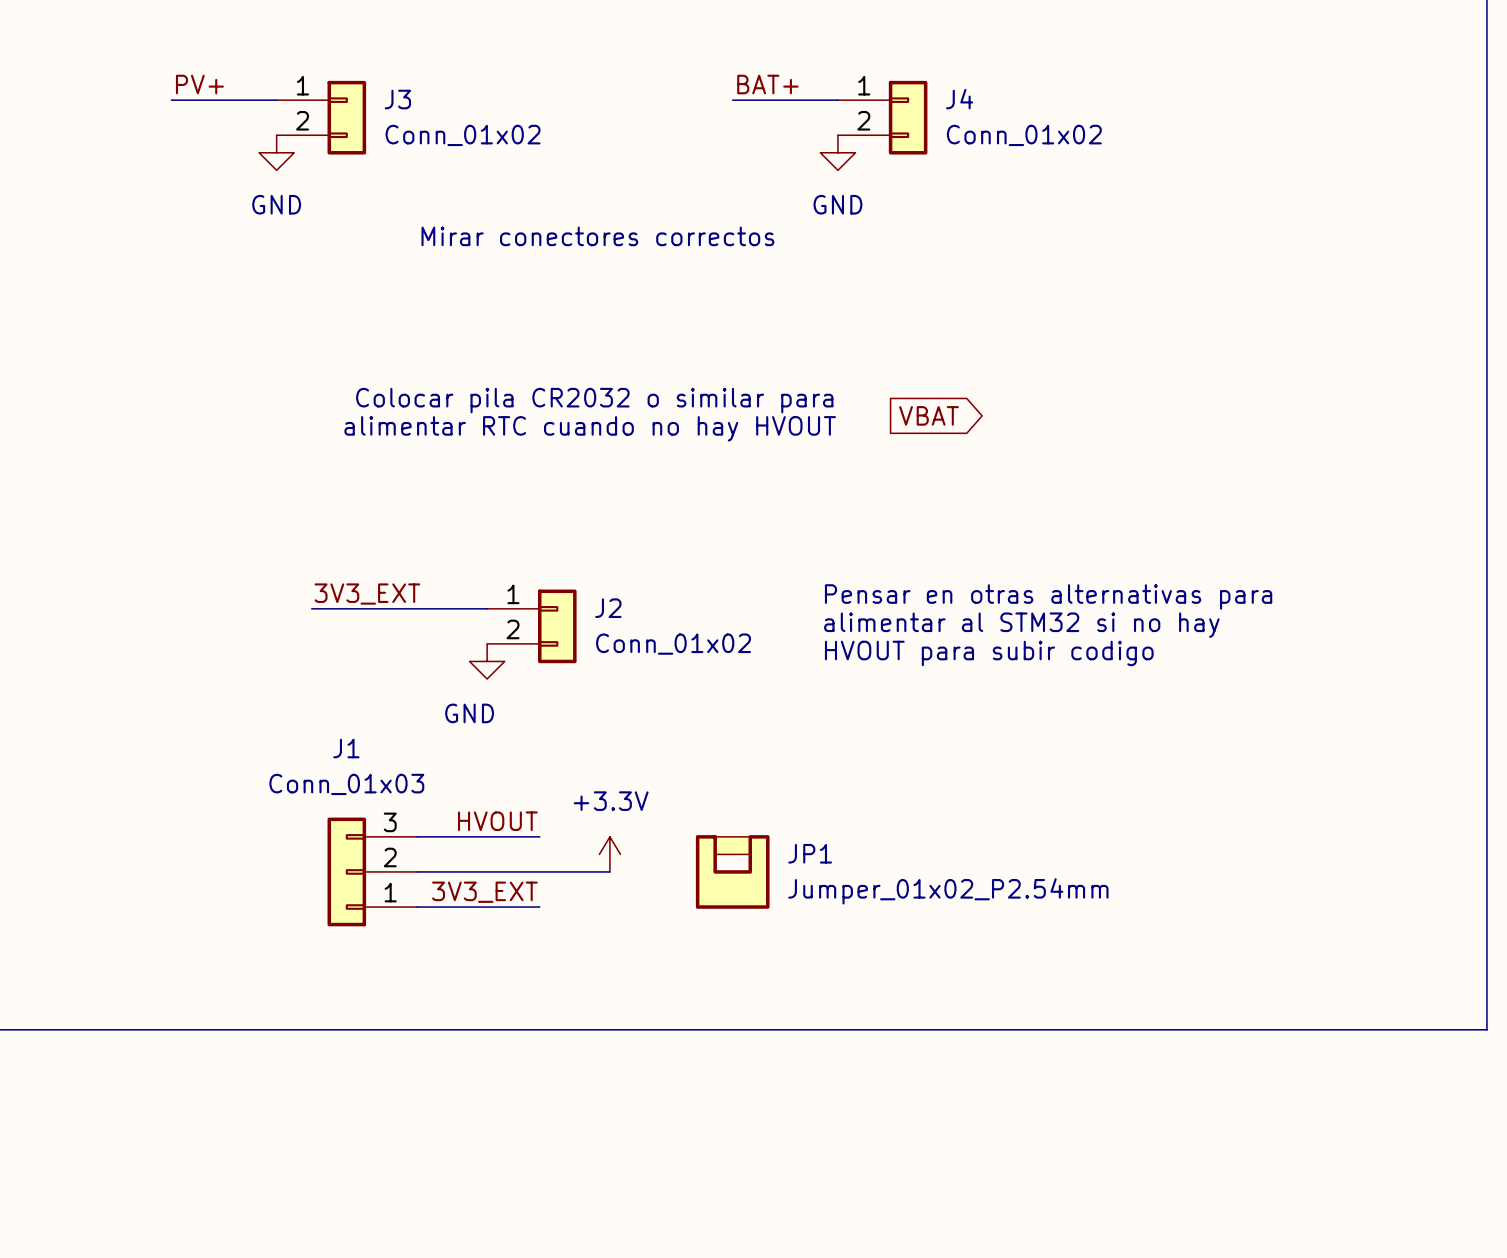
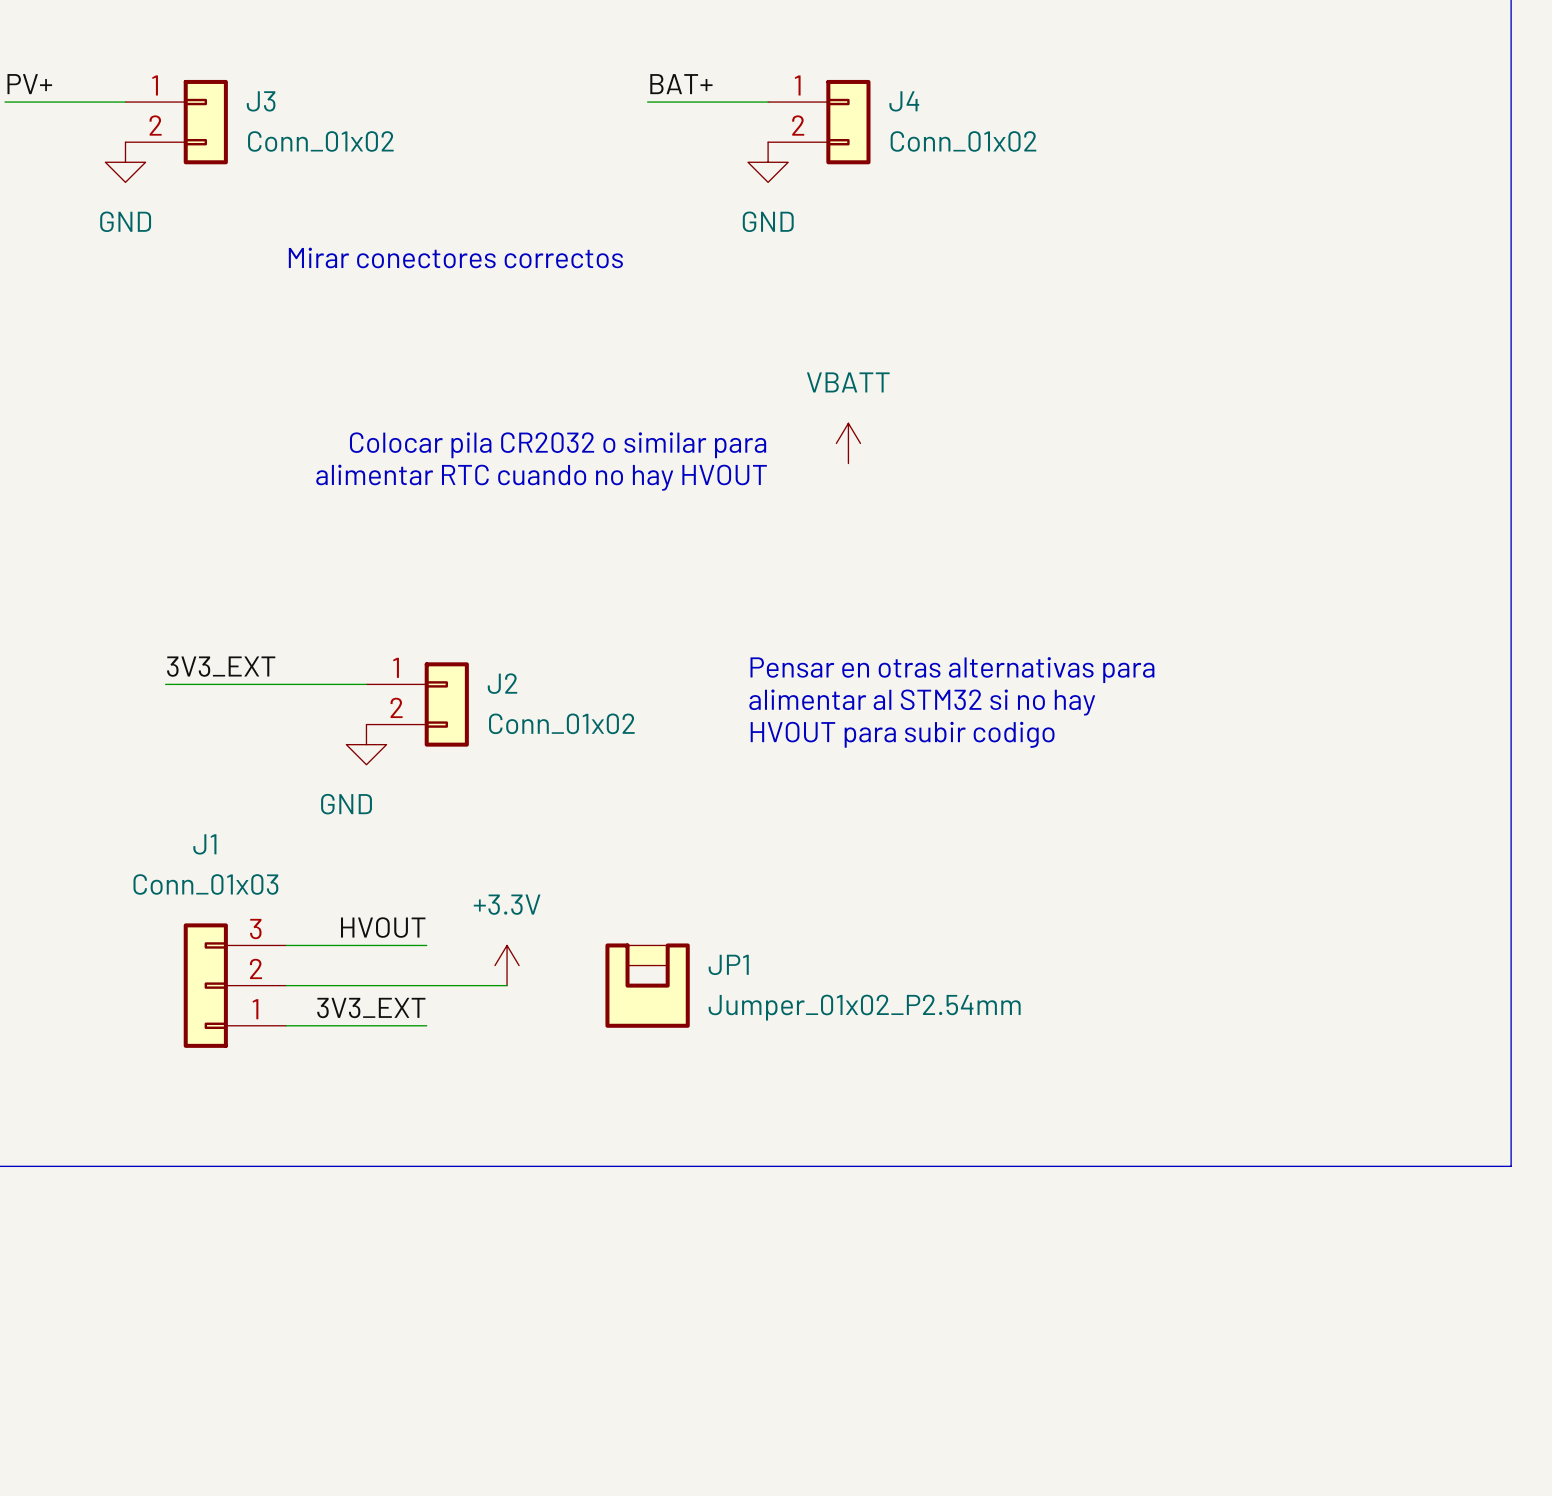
power symbol: none -> VBATT (848, 443)
global label: VBAT (929, 415) -> none

